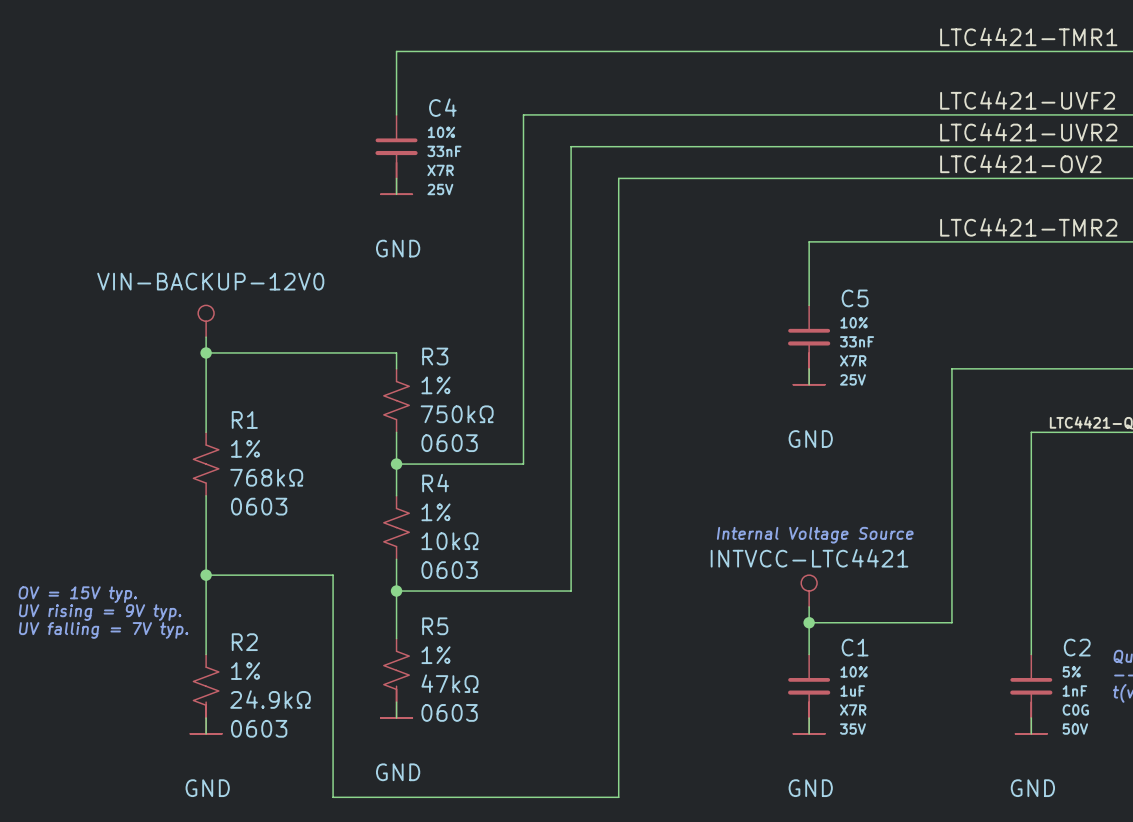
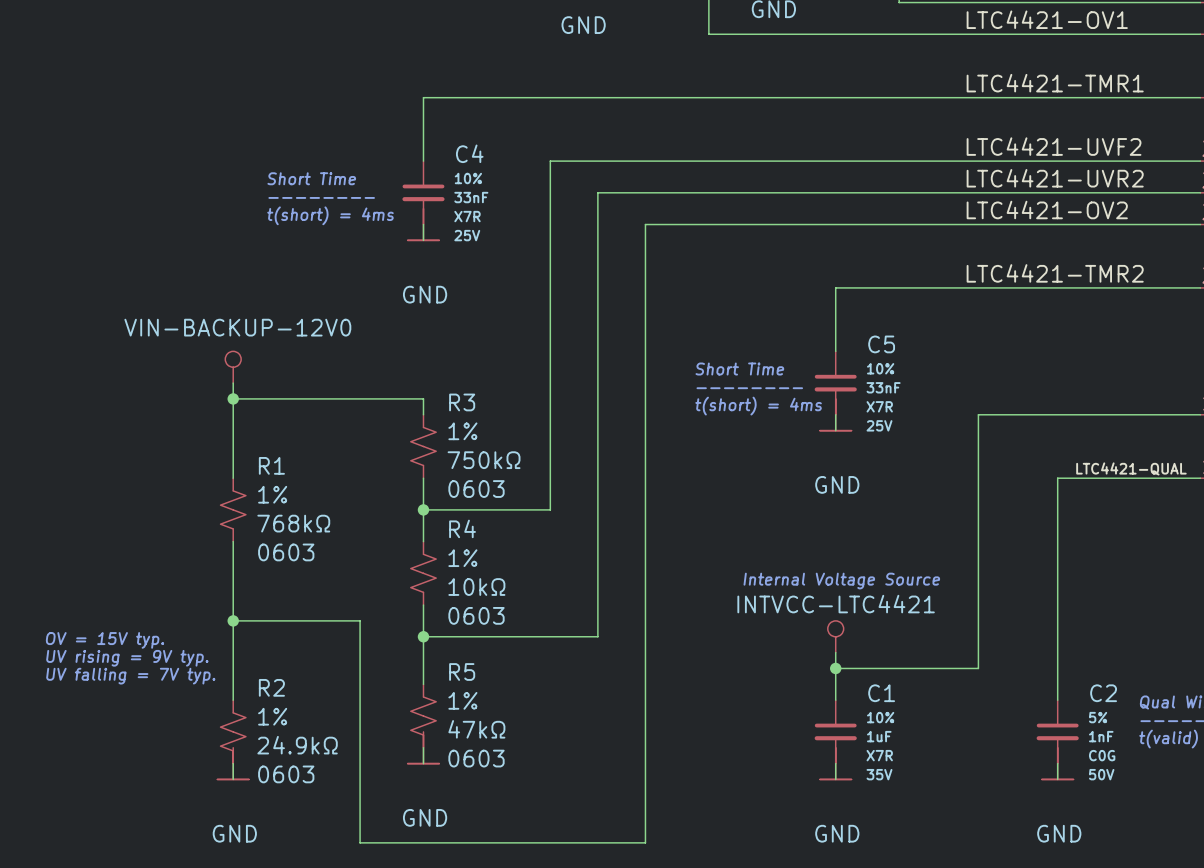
text: none -> Short Time (311, 178)
text: none -> -------- (321, 197)
text: none -> t(short) = 4ms (330, 215)
text: none -> Short Time (739, 369)
text: none -> -------- (749, 388)
text: none -> t(short) = 4ms (758, 406)

